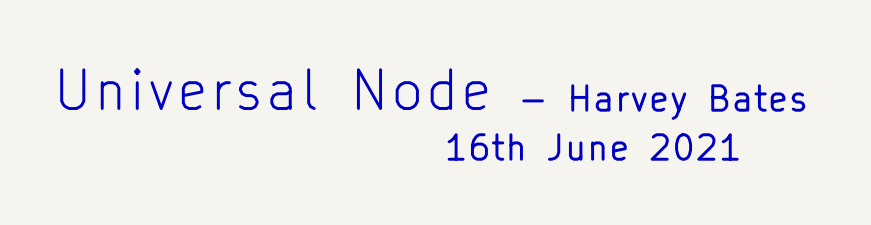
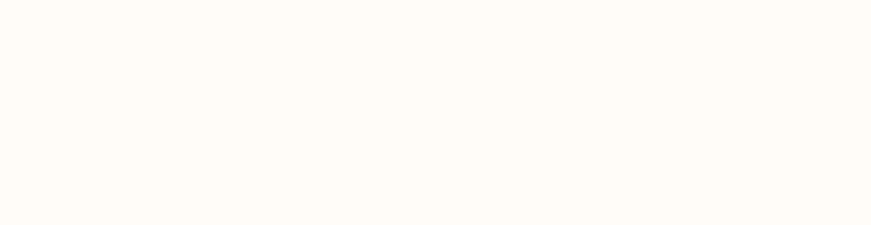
text: Universal Node (273, 89) -> none
text: - Harvey Bates (663, 102) -> none
text: 16th June 2021 (593, 146) -> none

